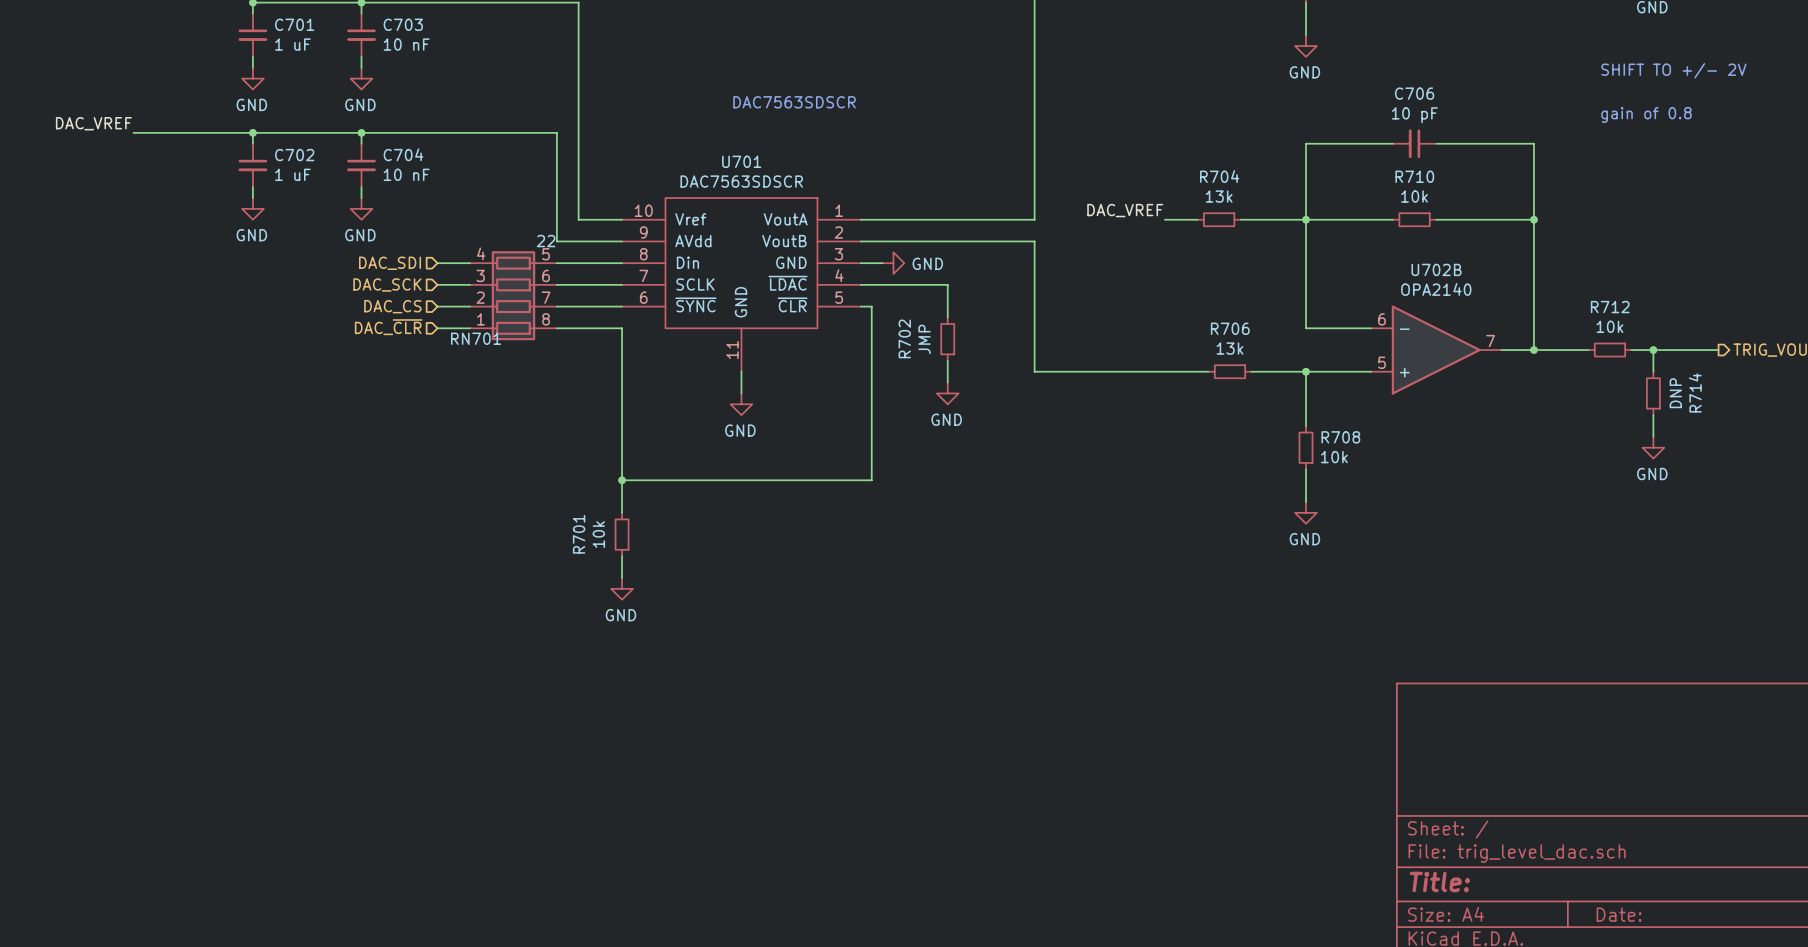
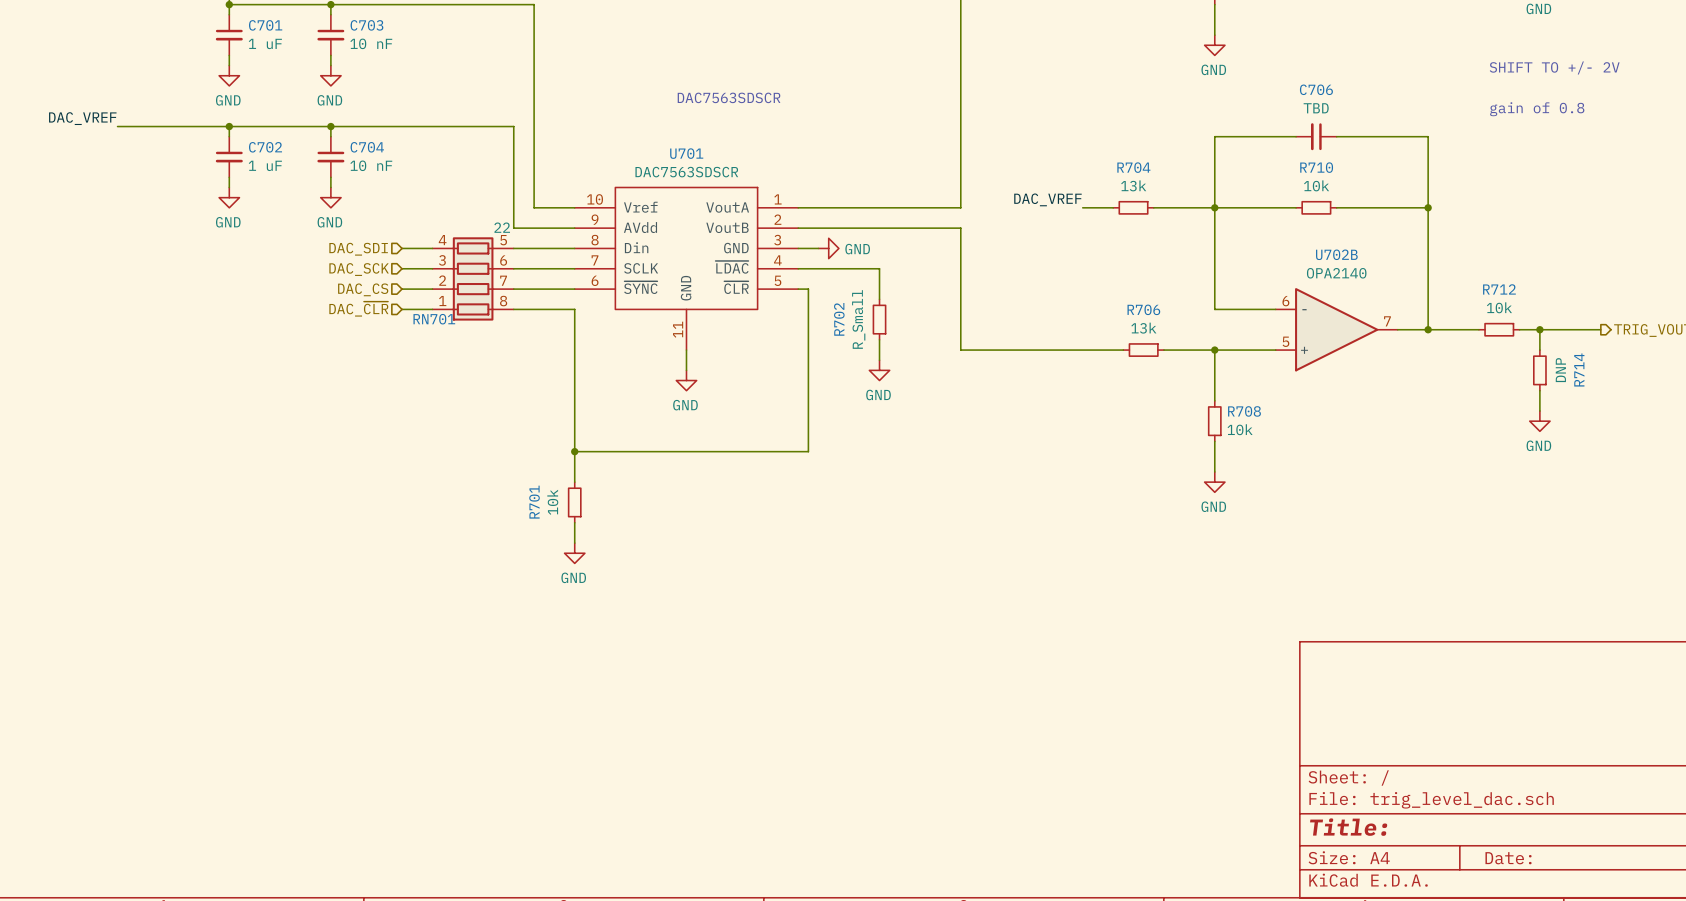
C706 value: 10 pF (1414, 115) -> TBD (1316, 108)
R702 value: JMP (924, 339) -> R_Small (858, 319)

